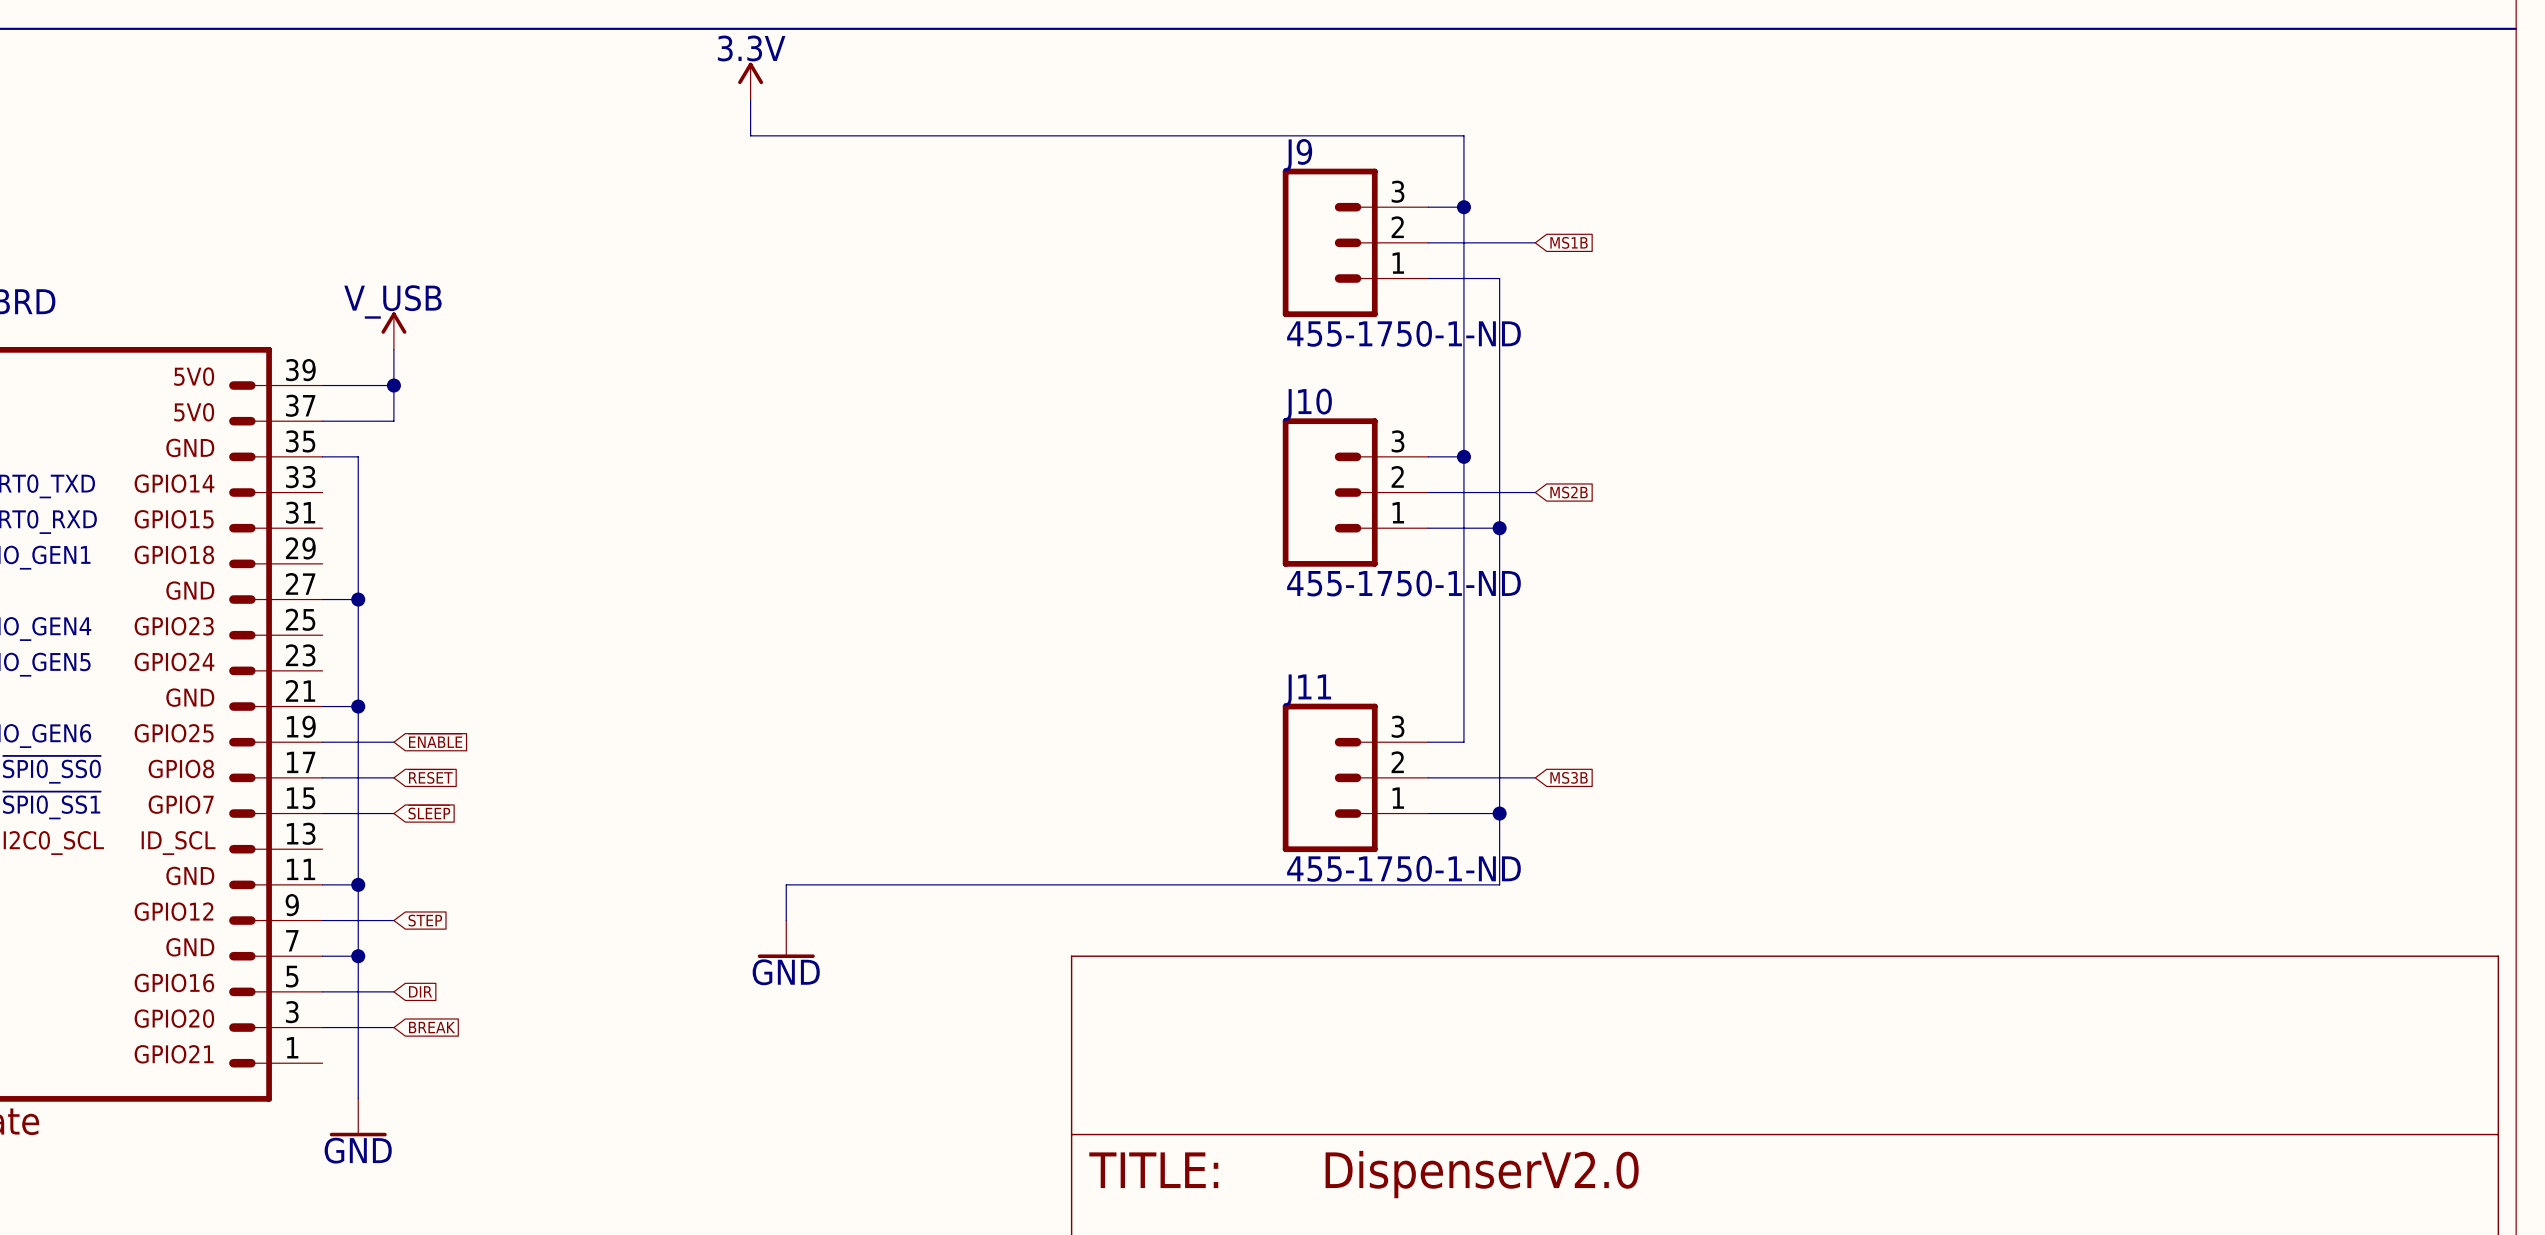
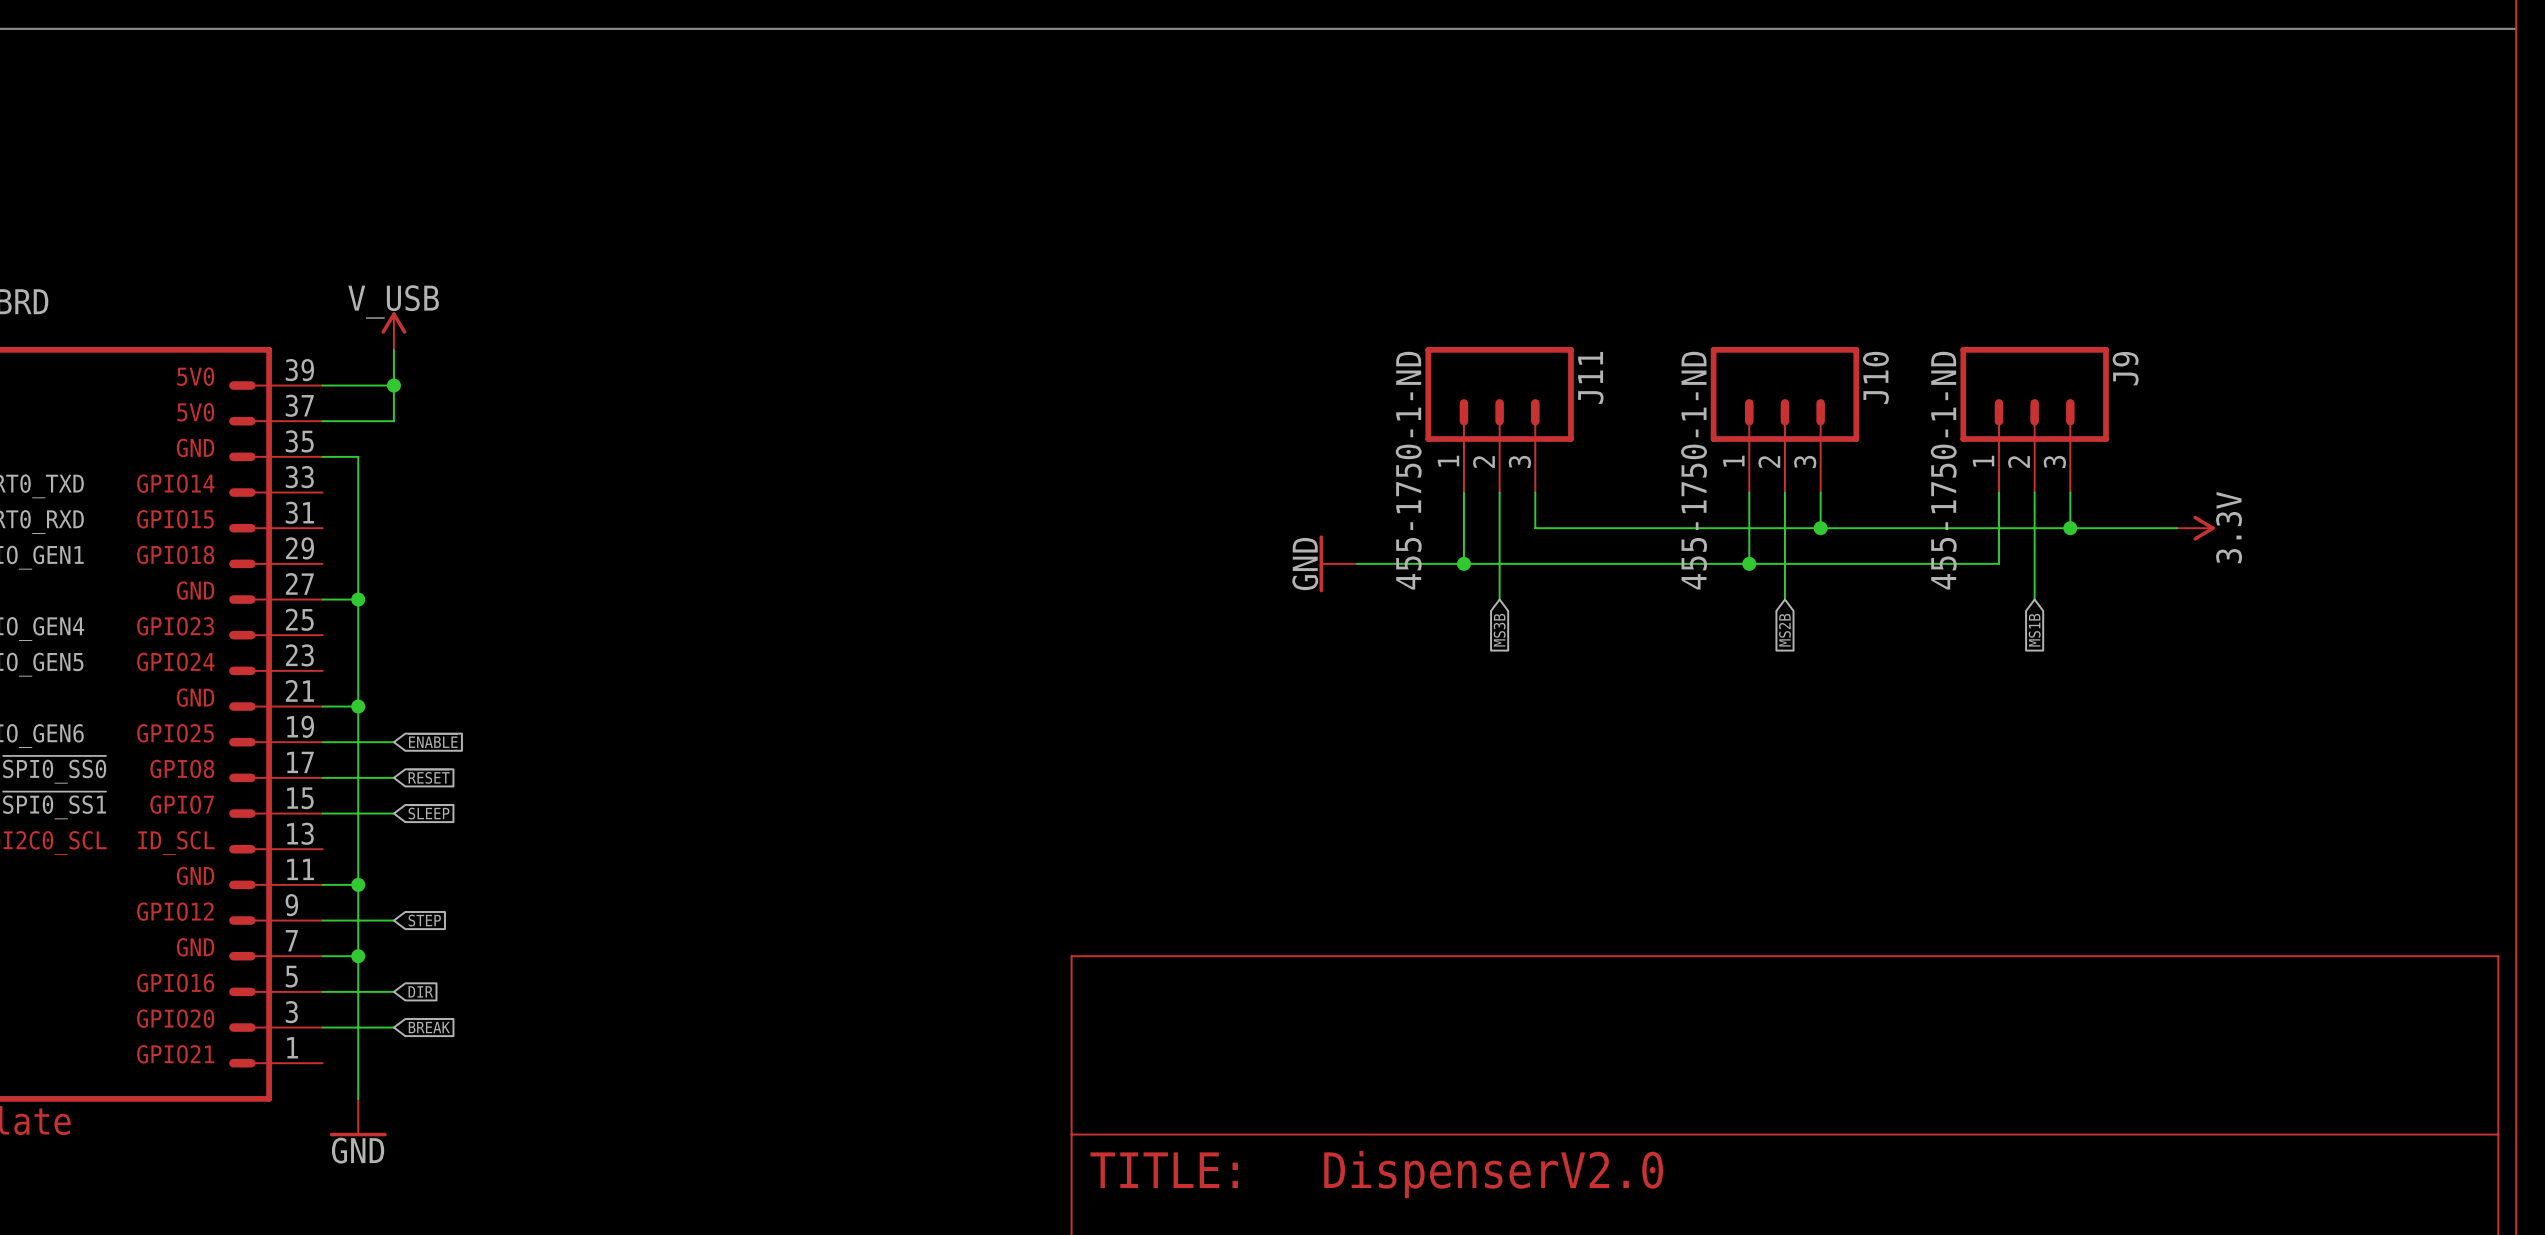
power symbol: 3.3V (750, 81) -> none
wire: (750, 100) (750, 135) (1463, 135) (1463, 492) -> none
wire: (1428, 207) (1463, 207) -> none
junction: (1463, 207) -> none
J9 rotation: 0° (1330, 242) -> 90° clockwise (2034, 394)
J9 position: (1355, 242) -> (2034, 419)
wire: (1428, 242) (1535, 242) -> none
global label: MS1B (1569, 242) -> none
wire: (1428, 278) (1499, 278) (1499, 492) -> none
wire: (1428, 456) (1463, 456) -> none
junction: (1463, 456) -> none
J10 rotation: 0° (1330, 492) -> 90° clockwise (1784, 394)
J10 position: (1355, 492) -> (1784, 419)
wire: (1428, 492) (1535, 492) -> (2177, 528) (1535, 528) (1535, 492)
global label rotation: 0° (1569, 492) -> 90° clockwise (1784, 630)
global label position: MS2B (1569, 492) -> MS2B (1784, 630)
wire: none -> (1749, 492) (1749, 563)
wire: none -> (1784, 492) (1784, 599)
wire: none -> (1820, 492) (1820, 528)
wire: none -> (1998, 492) (1998, 563) (1356, 563)
wire: none -> (2034, 492) (2034, 599)
wire: none -> (2070, 492) (2070, 528)
wire: (1428, 528) (1499, 528) -> none
junction position: (1499, 528) -> (1463, 563)
junction: none -> (1820, 528)
junction: none -> (2070, 528)
power symbol: none -> 3.3V (2196, 528)
power symbol: none -> GND (1338, 563)
wire: (1463, 563) (1463, 742) (1428, 742) -> none
junction: none -> (1749, 563)
wire: (1499, 599) (1499, 884) (786, 884) (786, 920) -> none
global label: none -> MS1B (2034, 630)
J11 rotation: 0° (1330, 777) -> 90° clockwise (1499, 394)
J11 position: (1355, 777) -> (1499, 419)
wire: (1428, 777) (1535, 777) -> none
global label rotation: 0° (1569, 777) -> 90° clockwise (1499, 630)
global label position: MS3B (1569, 777) -> MS3B (1499, 630)
wire: (1428, 813) (1499, 813) -> none
junction: (1499, 813) -> none
power symbol: GND (786, 939) -> none

